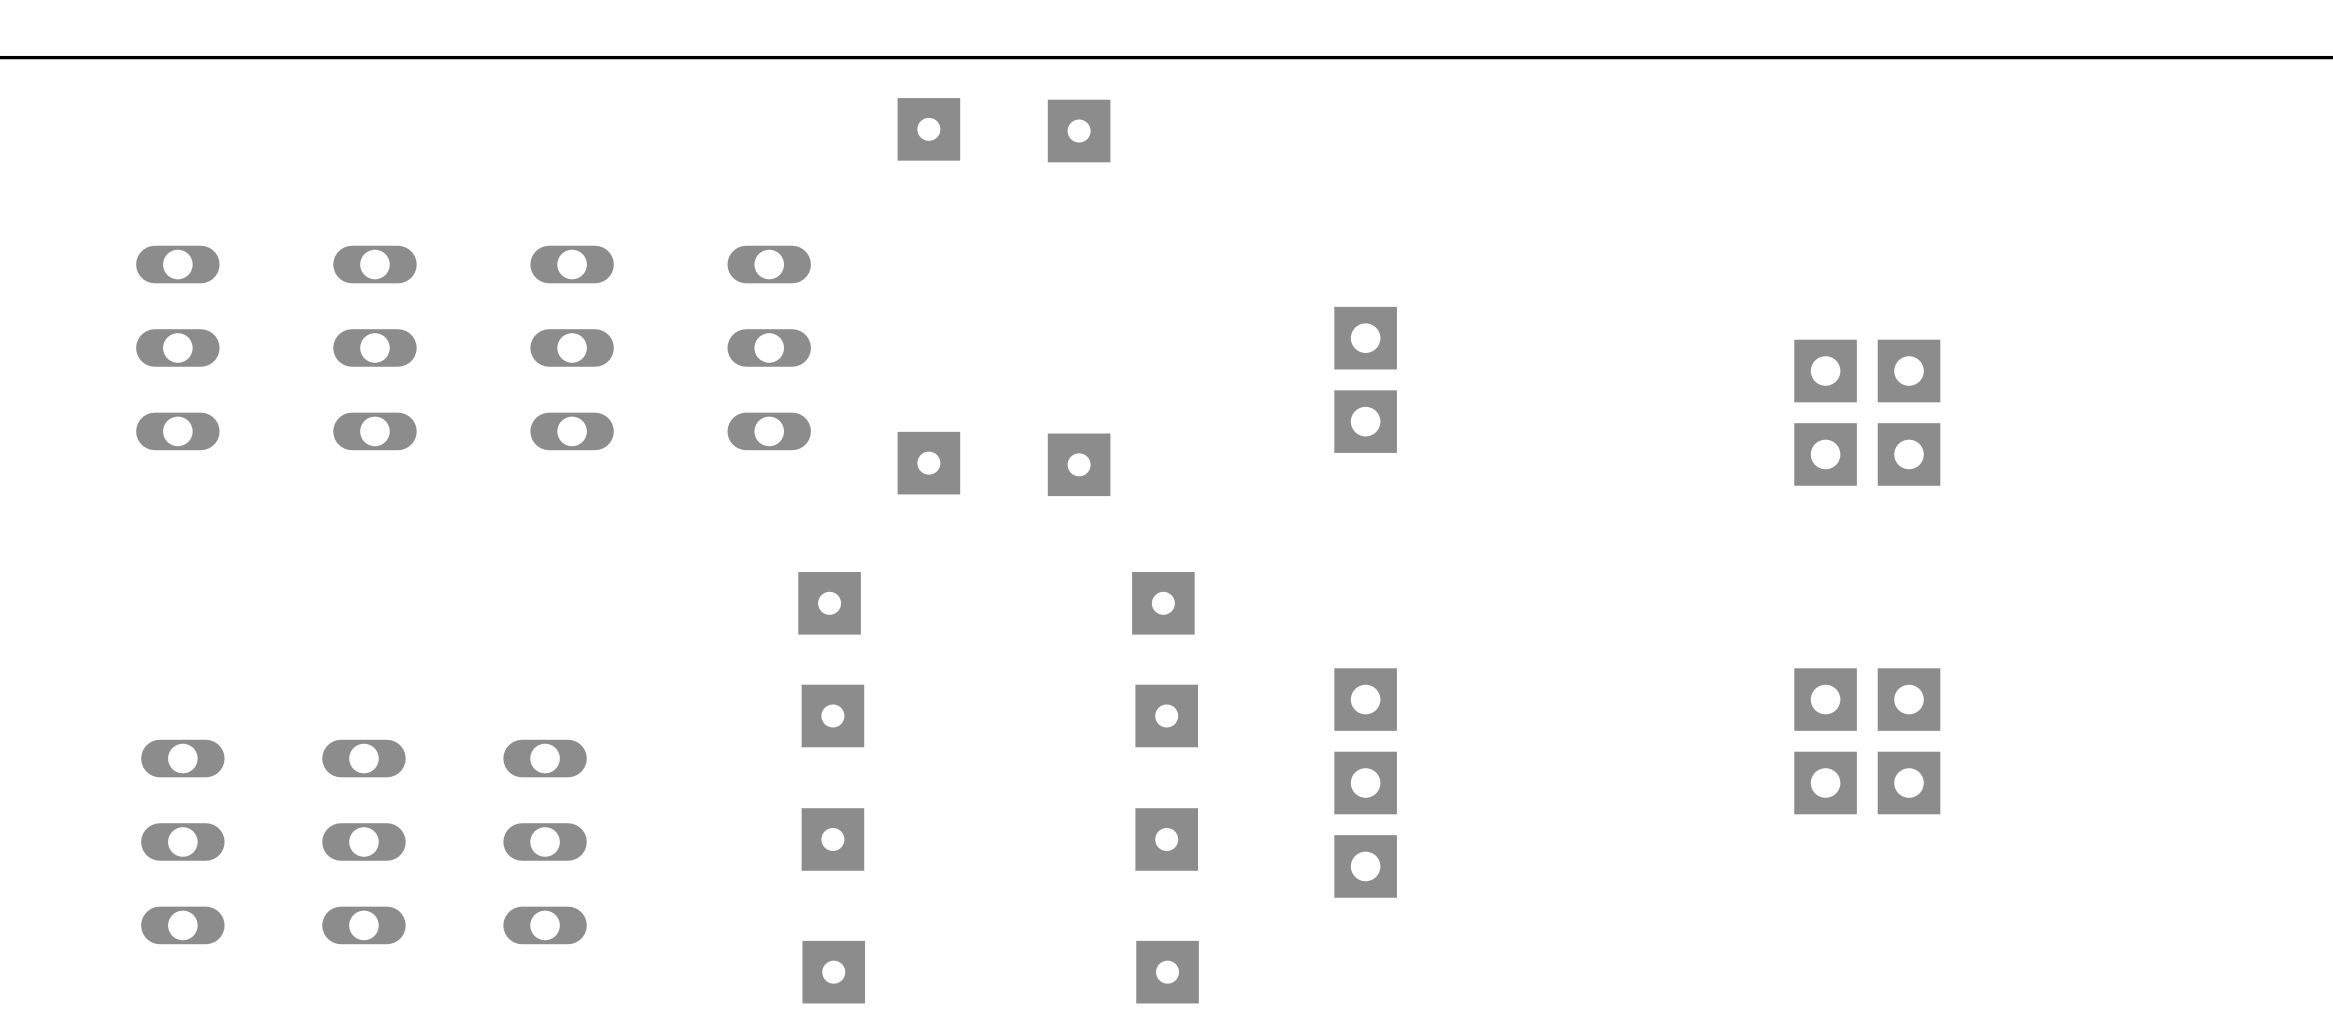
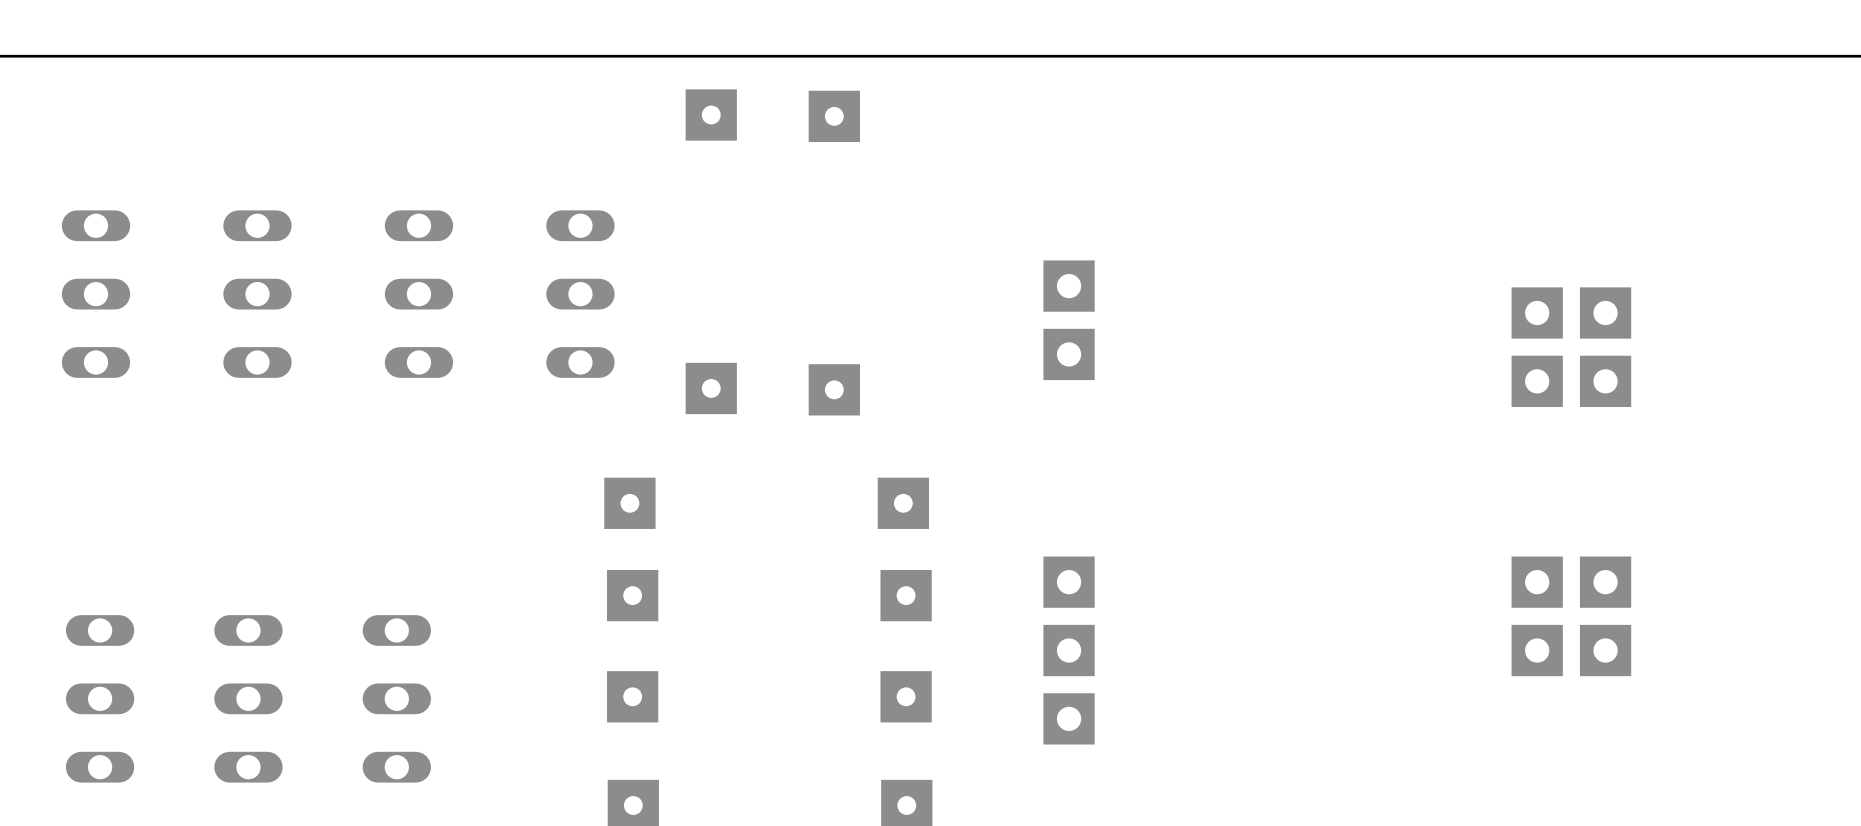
part position: (1867, 412) -> (1571, 347)
part position: (1867, 741) -> (1571, 616)

